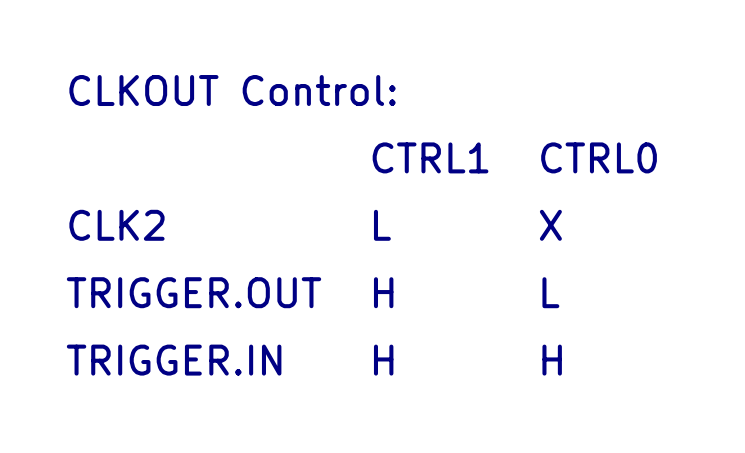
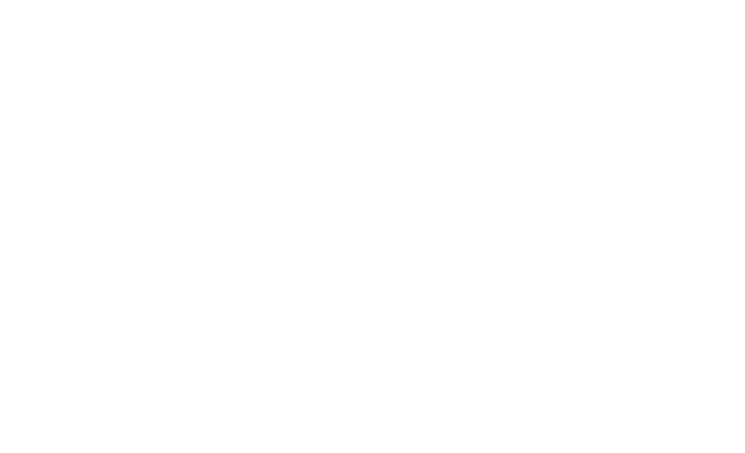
text: CLKOUT Control: (232, 90) -> none
text: CTRL1 (430, 157) -> none
text: CTRL0 (599, 157) -> none
text: CLK2 (116, 225) -> none
text: L (382, 225) -> none
text: X (550, 225) -> none
text: TRIGGER.OUT (194, 292) -> none
text: H (383, 292) -> none
text: L (550, 292) -> none
text: TRIGGER.IN (174, 360) -> none
text: H (383, 360) -> none
text: H (552, 360) -> none

